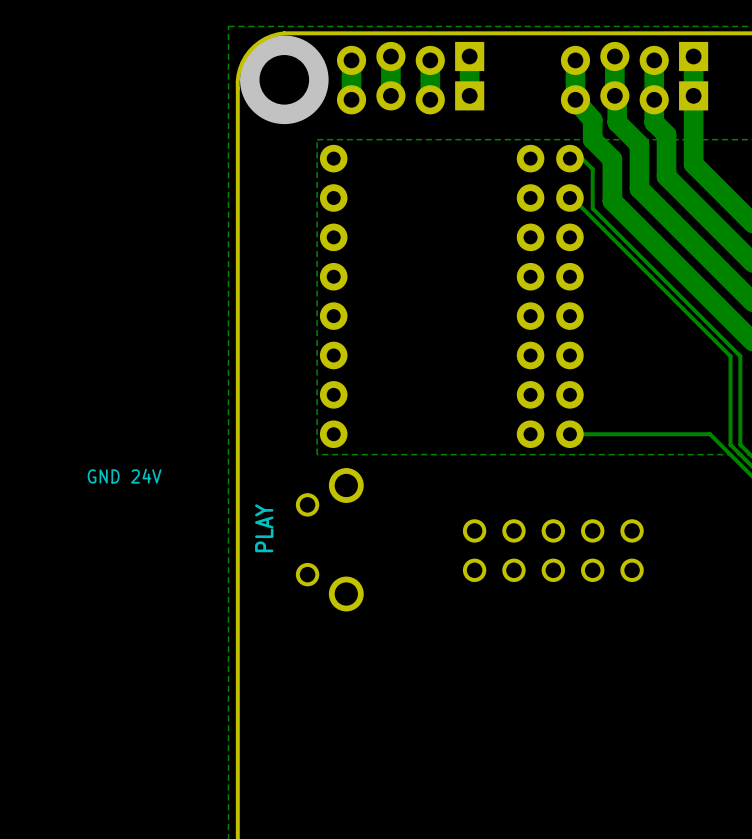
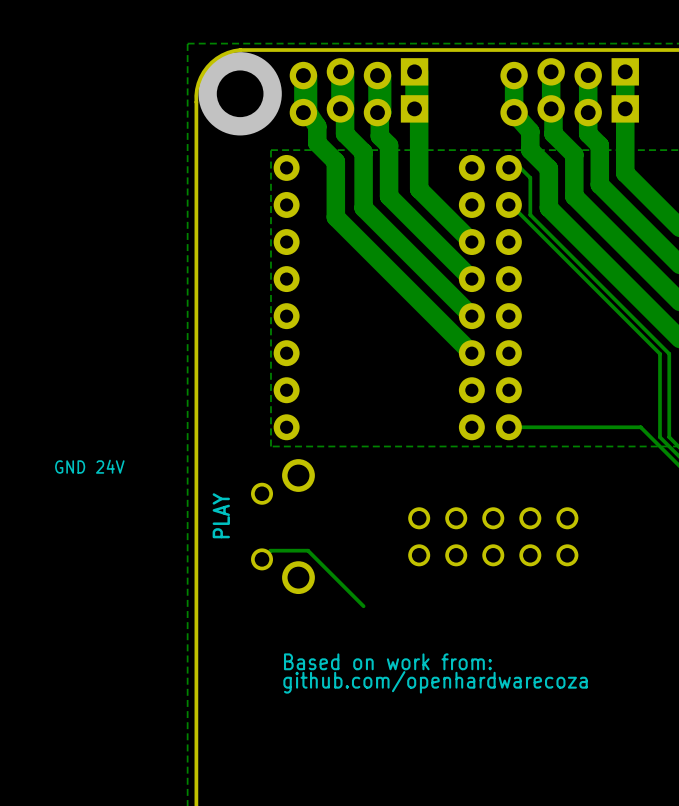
track: none -> (345, 71) (345, 133) (363, 152) (363, 207) (471, 316)
track: none -> (419, 71) (419, 189) (471, 242)
track: none -> (308, 75) (308, 112) (317, 126) (317, 143) (335, 161) (335, 217) (471, 353)
track: none -> (382, 75) (379, 136) (389, 145) (389, 196) (471, 279)
track: none -> (262, 559) (270, 550) (308, 550) (363, 606)
text: none -> Based on work from: (387, 661)
text: none -> github.com/openhardwarecoza (435, 682)

